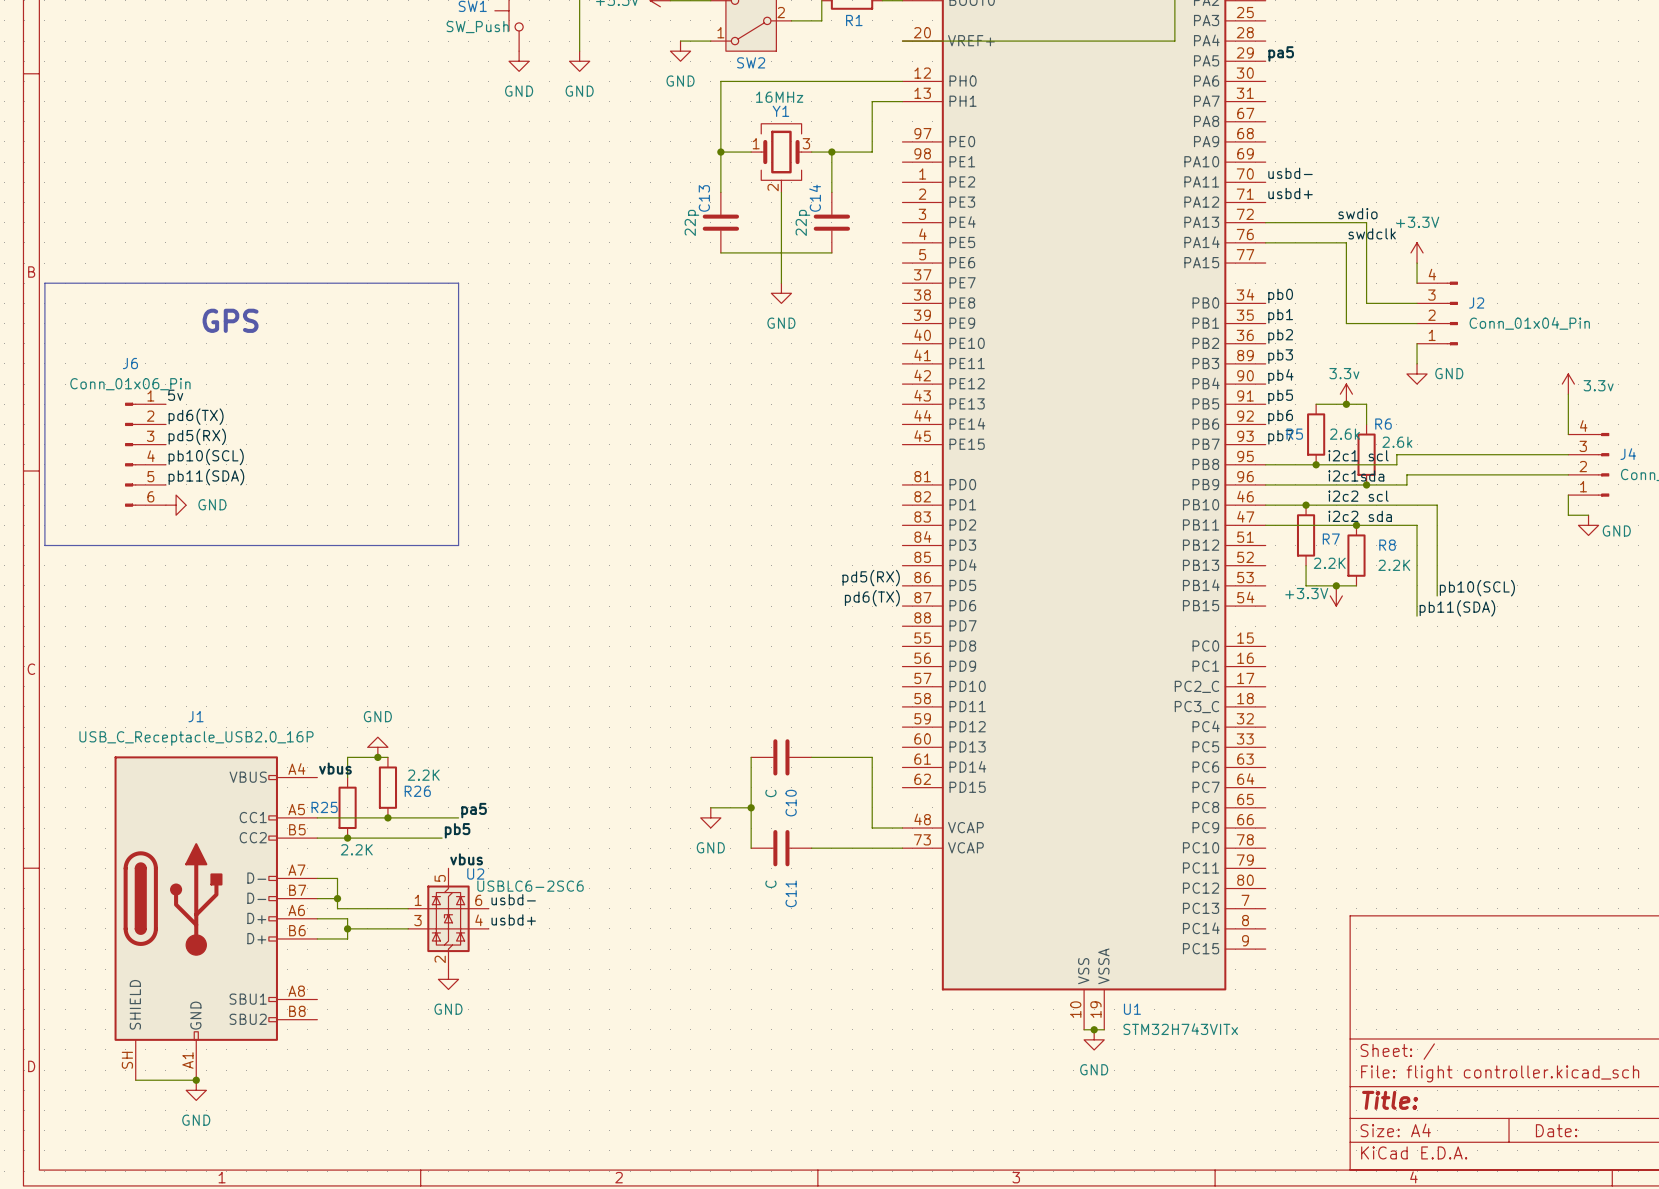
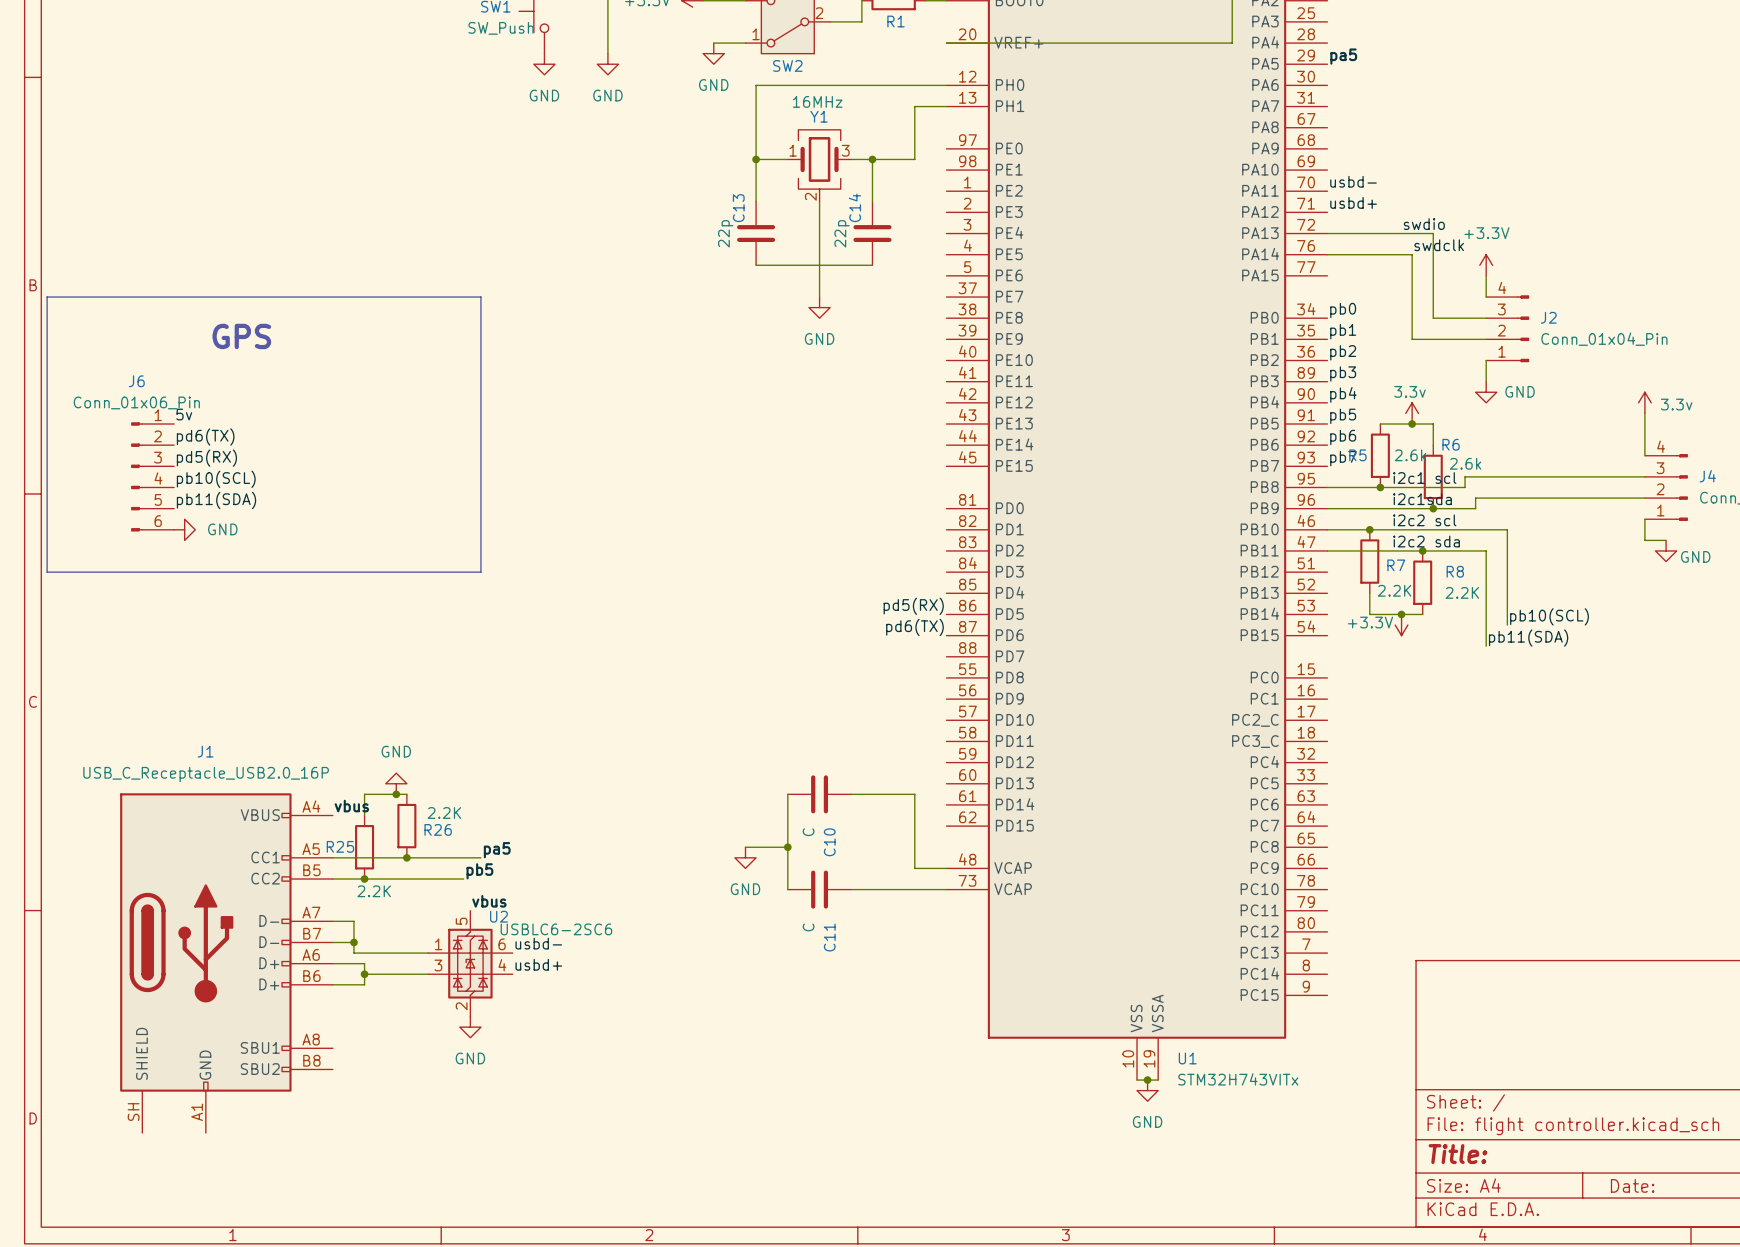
wire: (135, 1080) (196, 1080) -> none
junction: (196, 1080) -> none
power symbol: GND (196, 1090) -> none

